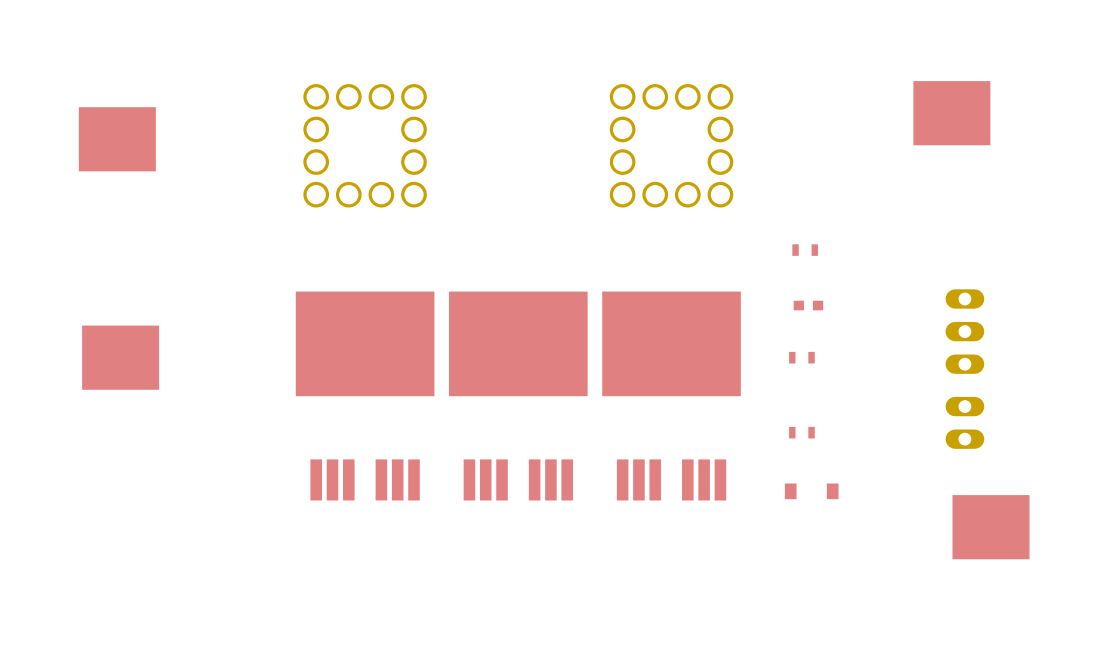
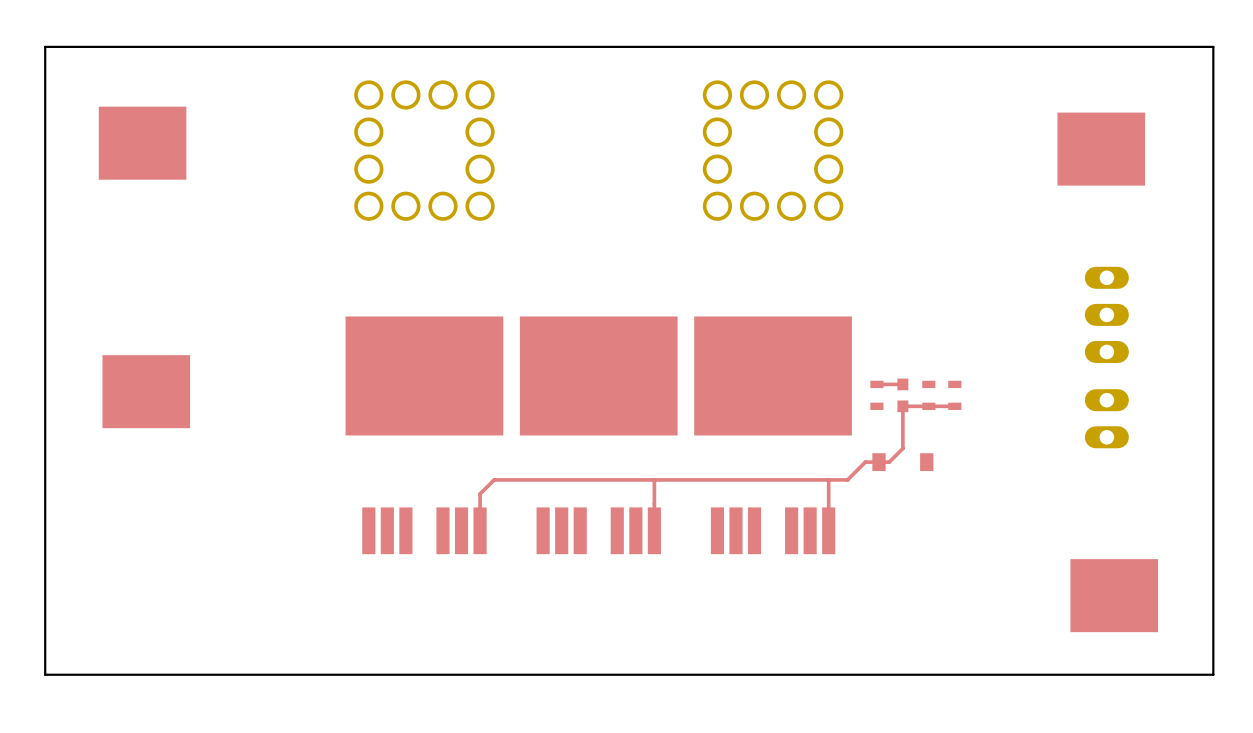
board edge: none -> (1213, 46) (45, 46) (45, 674) (1213, 674) (1213, 46)
part position: (951, 113) -> (1101, 149)
part: (805, 250) -> none
part rotation: 0° (808, 305) -> 90° clockwise (902, 395)
part position: (808, 305) -> (902, 395)
part position: (964, 331) -> (1106, 314)
top track: none -> (902, 384) (876, 384)
part rotation: 0° (801, 357) -> 90° clockwise (928, 395)
part: none -> (876, 395)
part: none -> (954, 395)
top track: none -> (954, 406) (902, 406) (902, 448) (889, 462) (865, 462) (847, 479) (494, 479) (480, 494) (480, 530)
part position: (964, 422) -> (1106, 418)
part: (801, 432) -> none
top track: none -> (654, 479) (654, 530)
top track: none -> (827, 479) (828, 530)
part position: (811, 491) -> (902, 462)
part position: (990, 527) -> (1114, 595)

